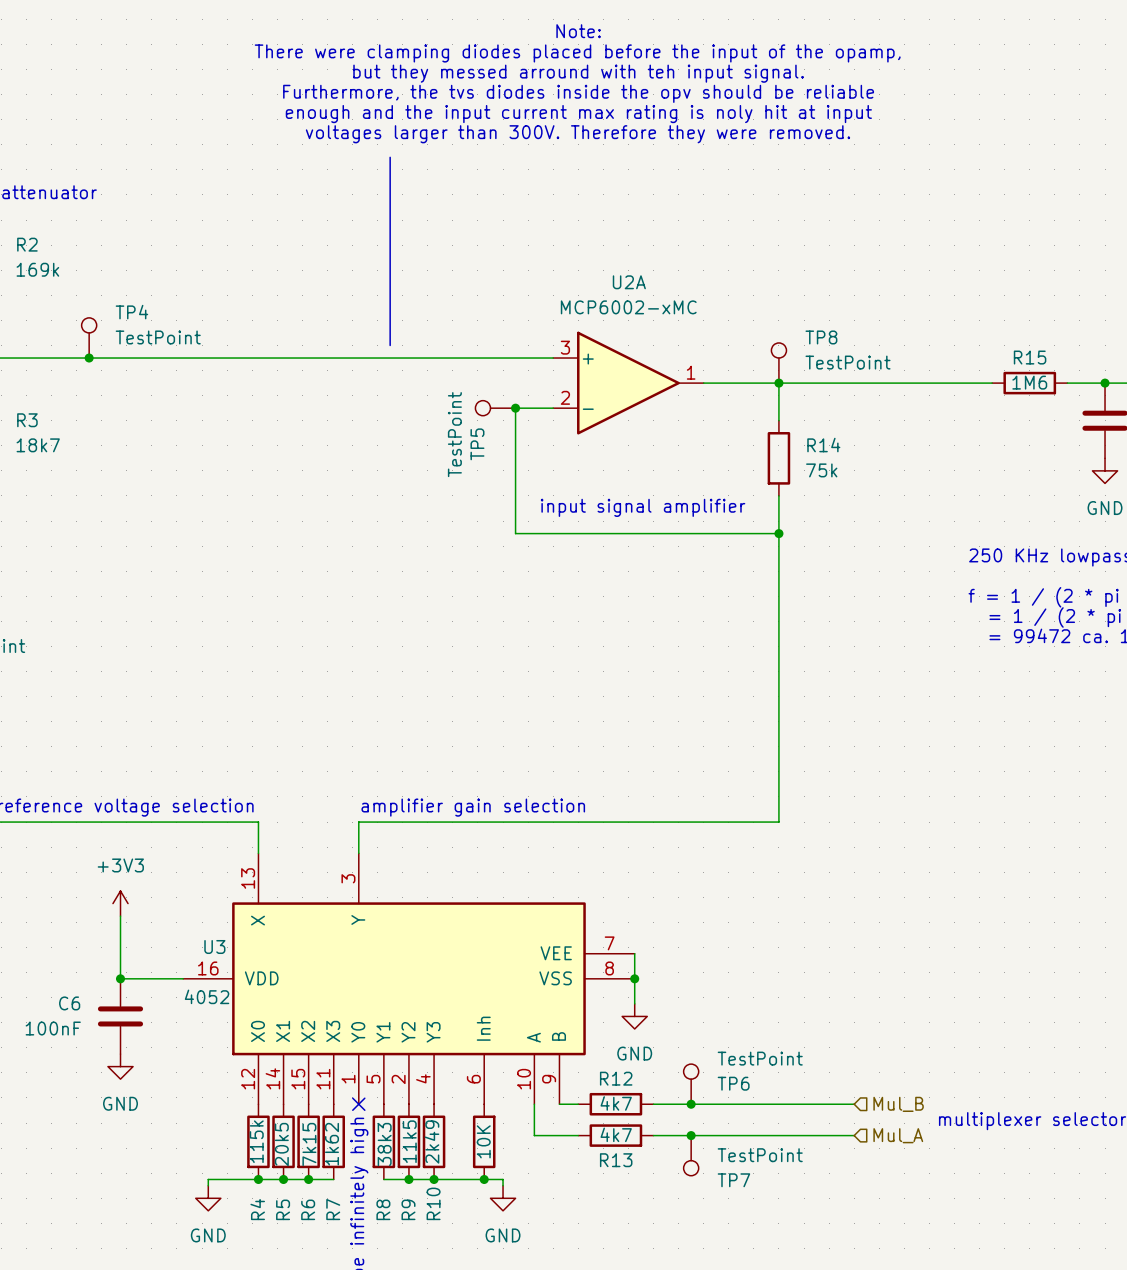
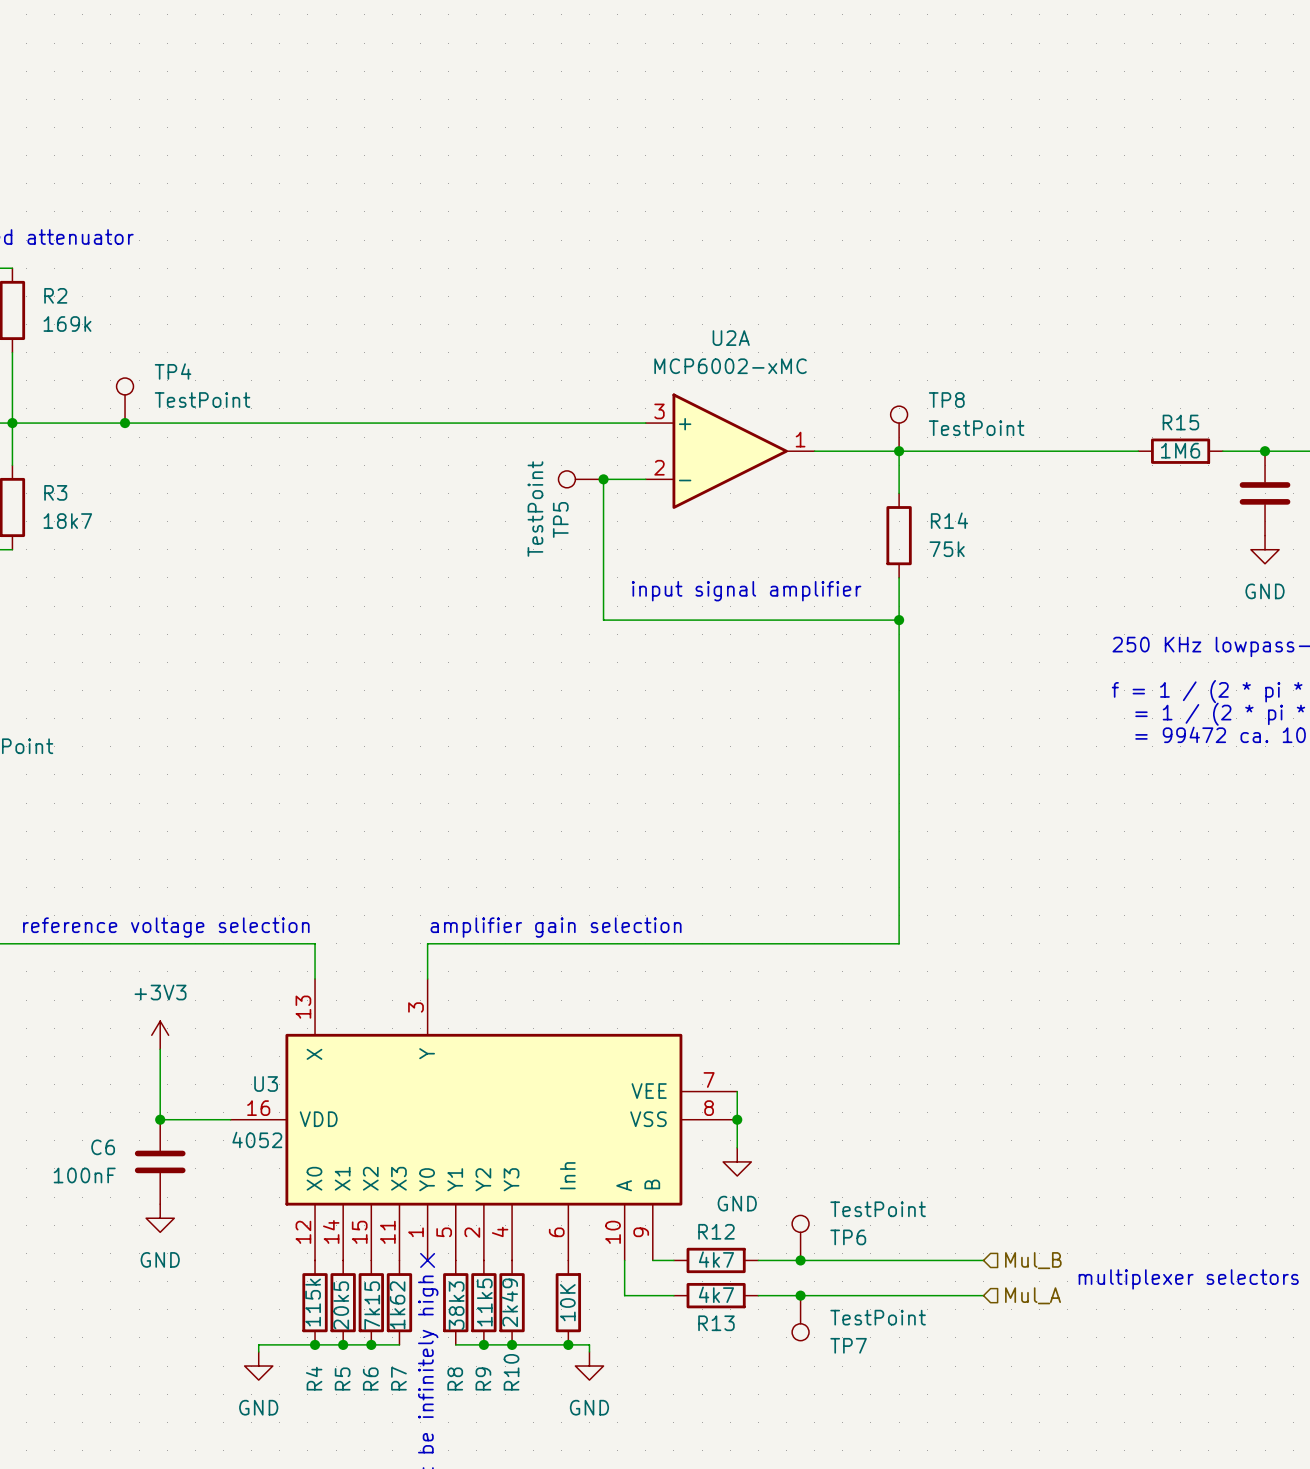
text: Note: (578, 31) -> none
text: There were clamping diodes placed before the input of the opamp, (577, 53) -> none
text: but they messed arround with teh input signal. (578, 73) -> none
text: Furthermore, the tvs diodes inside the opv should be reliable (578, 93) -> none
text: enough and the input current max rating is noly hit at input (578, 114) -> none
text: voltages larger than 300V. Therefore they were removed. (577, 134) -> none
line: (390, 157) (390, 345) -> none

